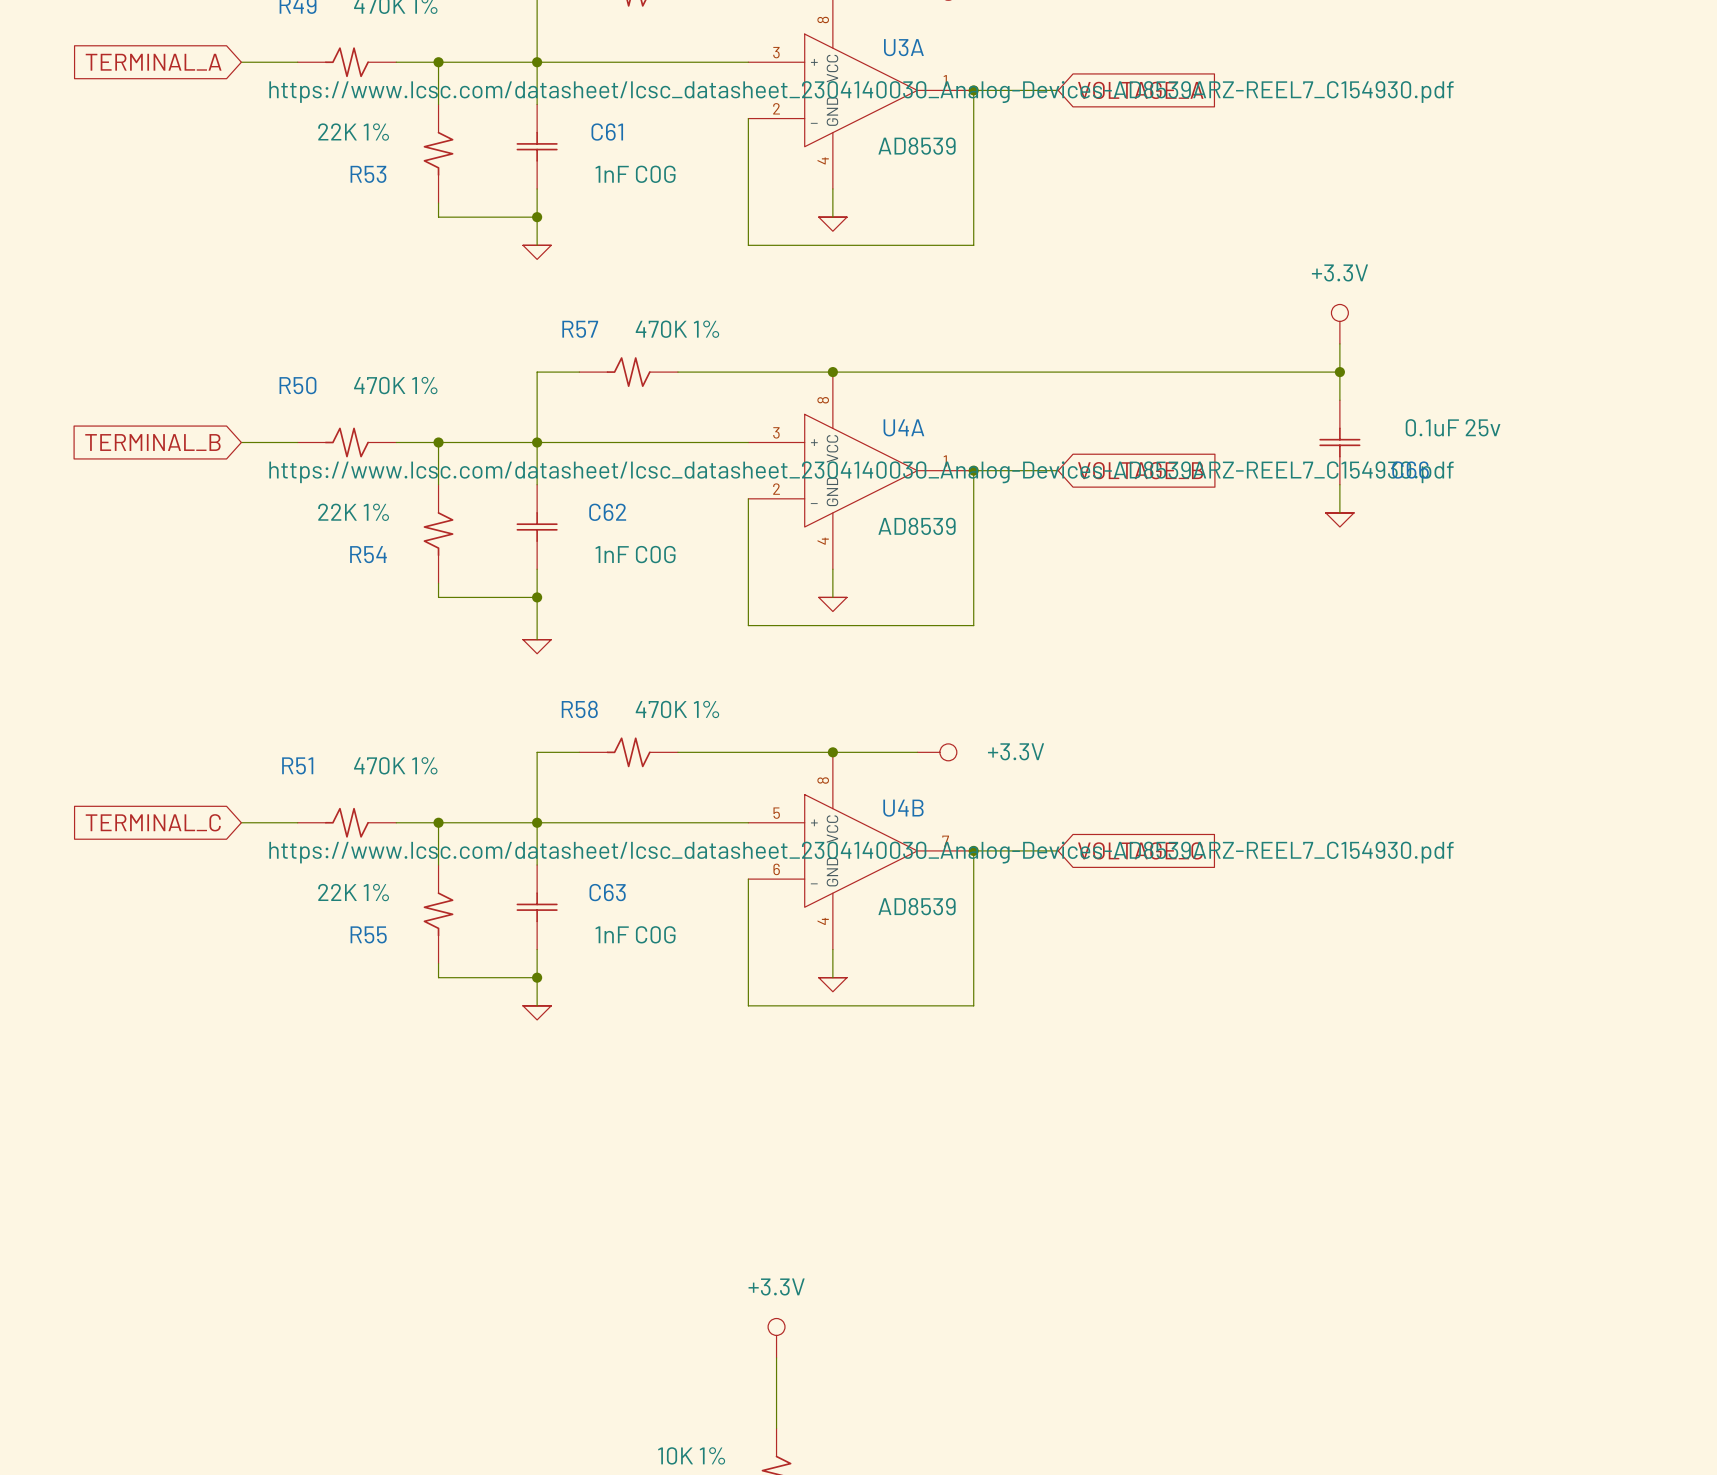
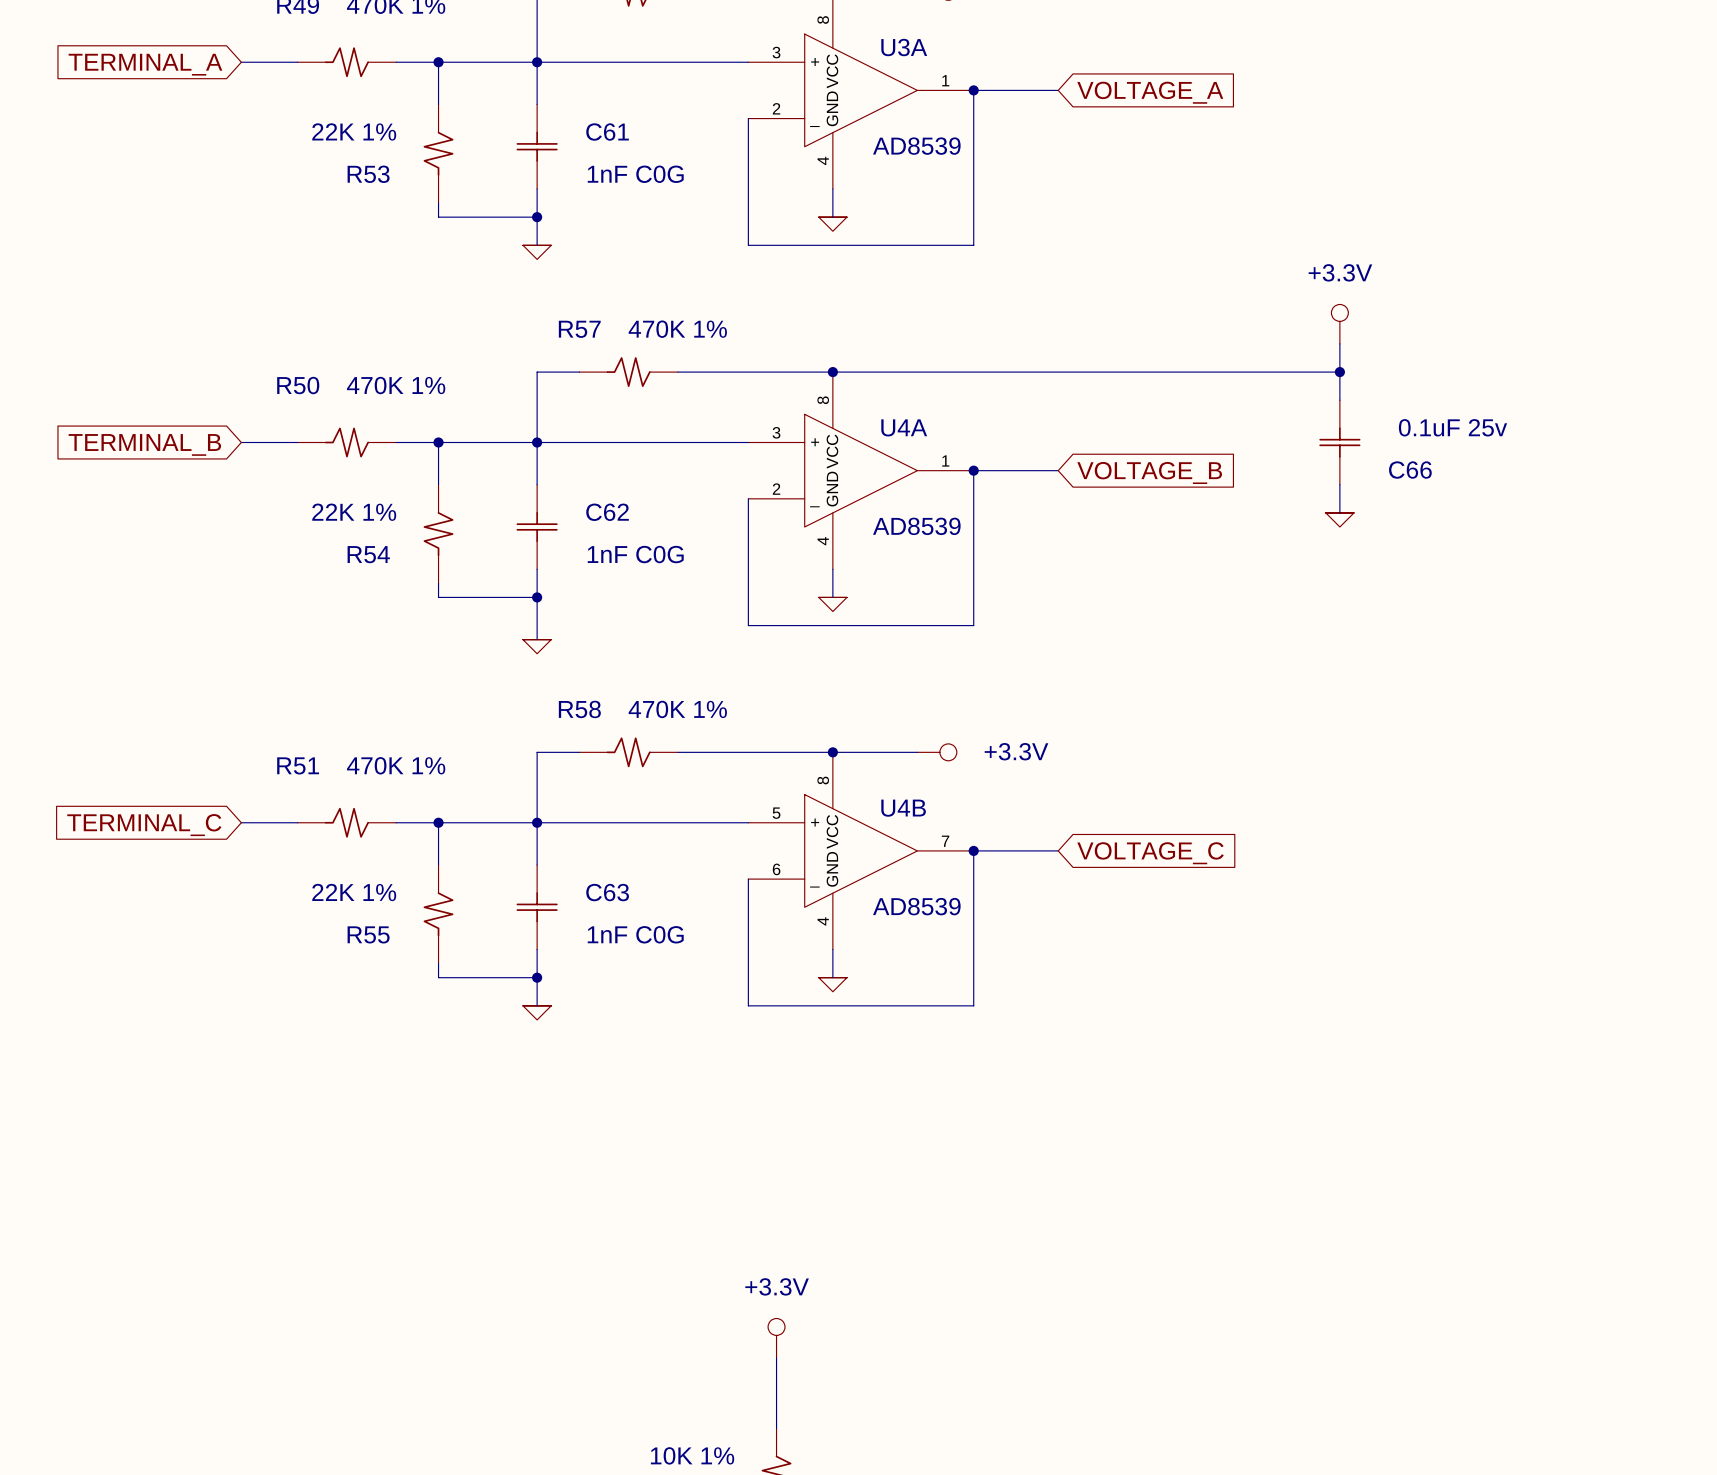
U3A text: https://www.lcsc.com/datasheet/lcsc_datasheet_2304140030_Analog-Devices-AD8539ARZ-REEL7_C154930.pdf (861, 92) -> none
U4A text: https://www.lcsc.com/datasheet/lcsc_datasheet_2304140030_Analog-Devices-AD8539ARZ-REEL7_C154930.pdf (861, 472) -> none
U4B text: https://www.lcsc.com/datasheet/lcsc_datasheet_2304140030_Analog-Devices-AD8539ARZ-REEL7_C154930.pdf (861, 852) -> none

